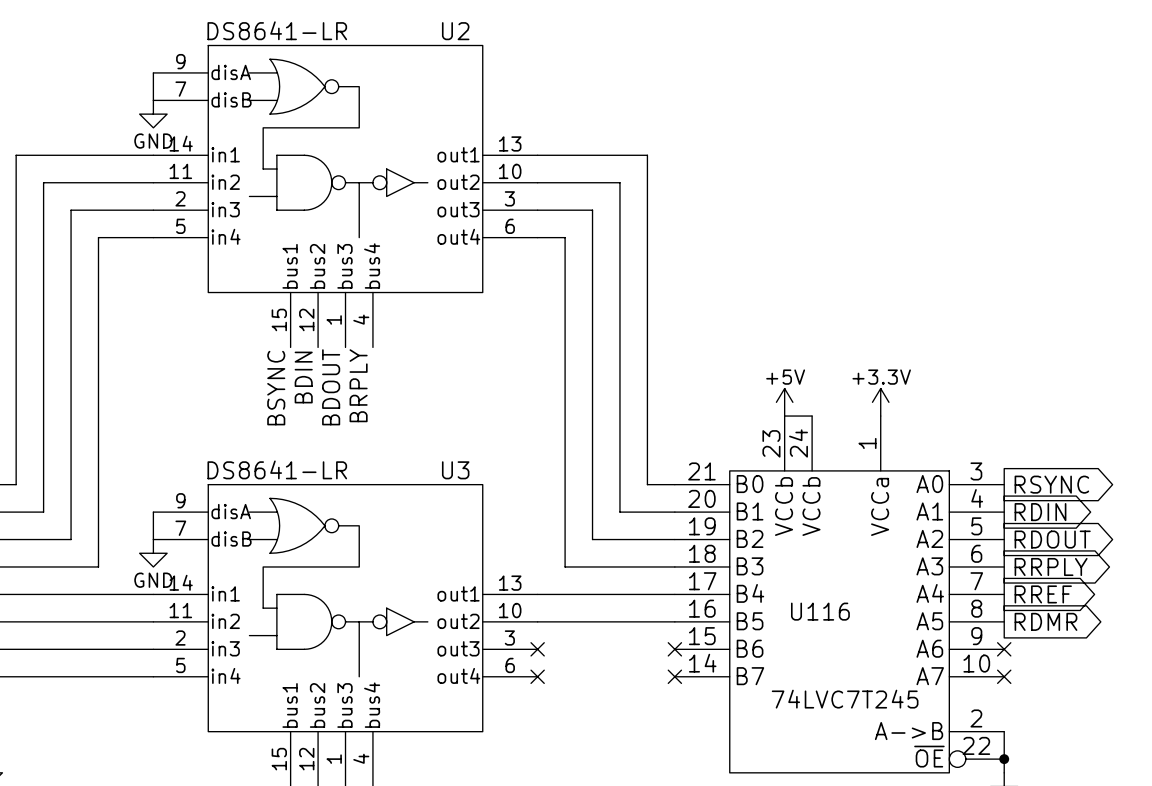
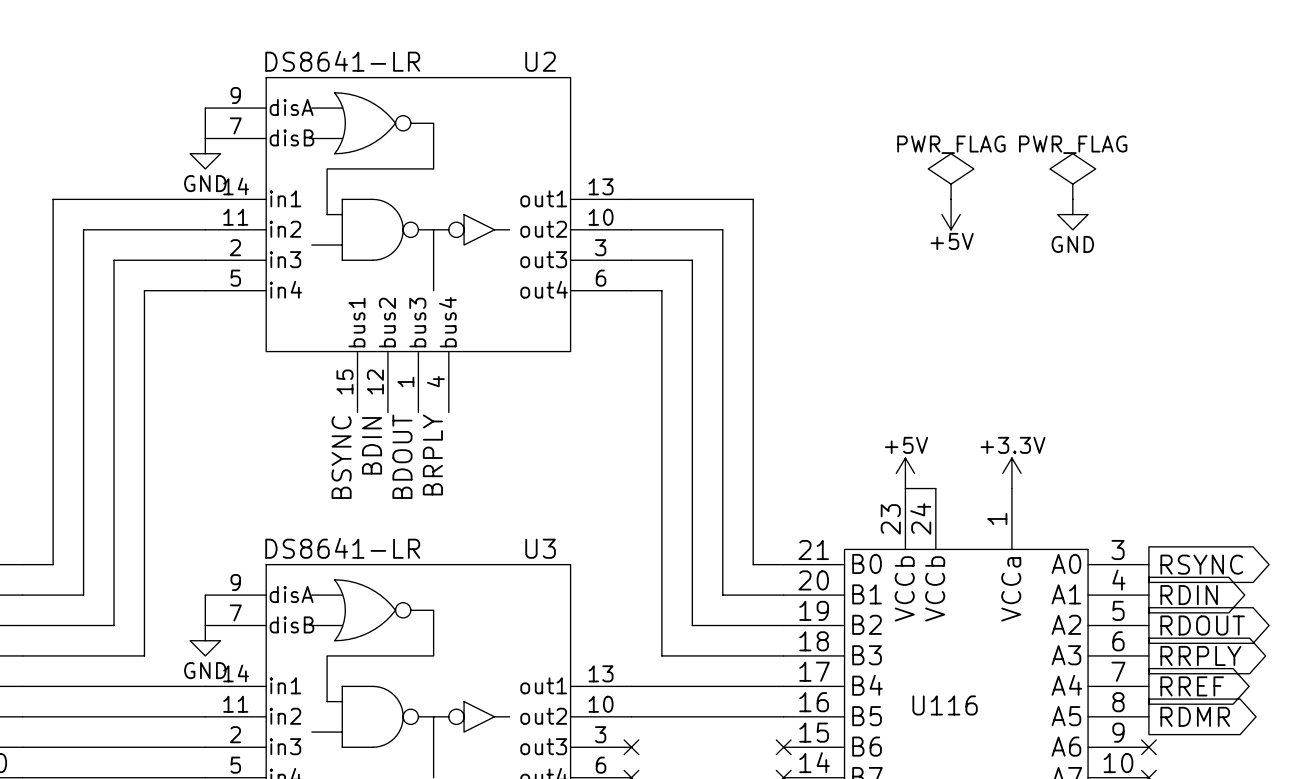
power symbol: none -> PWR_FLAG (951, 176)
power symbol: none -> PWR_FLAG (1072, 176)
power symbol: none -> +5V (951, 214)
power symbol: none -> GND (1072, 214)

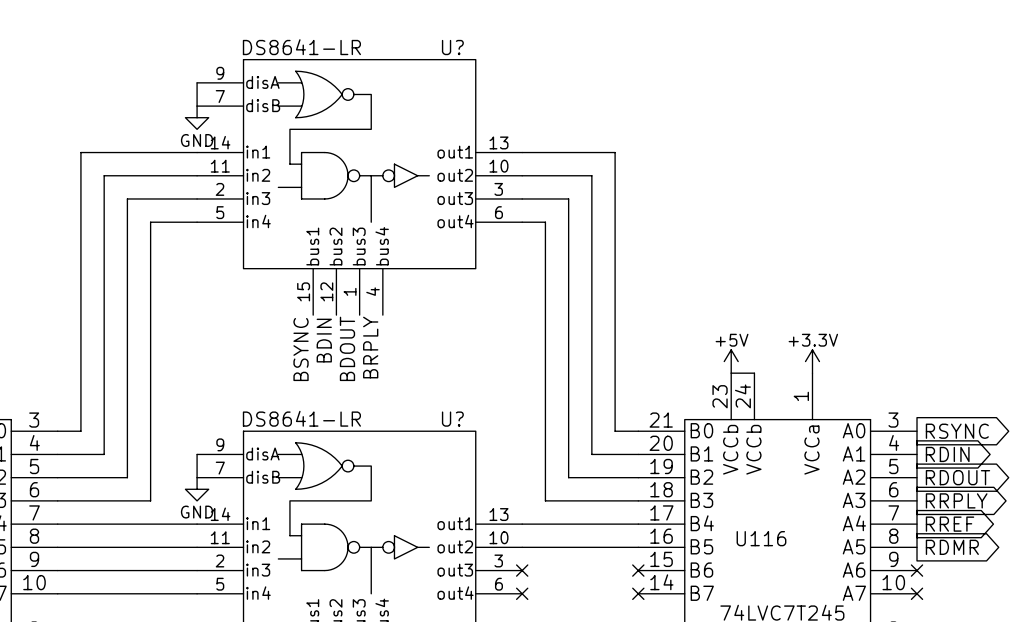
U2 name: U2 (540, 61) -> U? (452, 47)
power symbol: PWR_FLAG (951, 176) -> none
power symbol: PWR_FLAG (1072, 176) -> none
power symbol: +5V (951, 214) -> none
power symbol: GND (1072, 214) -> none
U3 name: U3 (540, 548) -> U? (452, 419)

